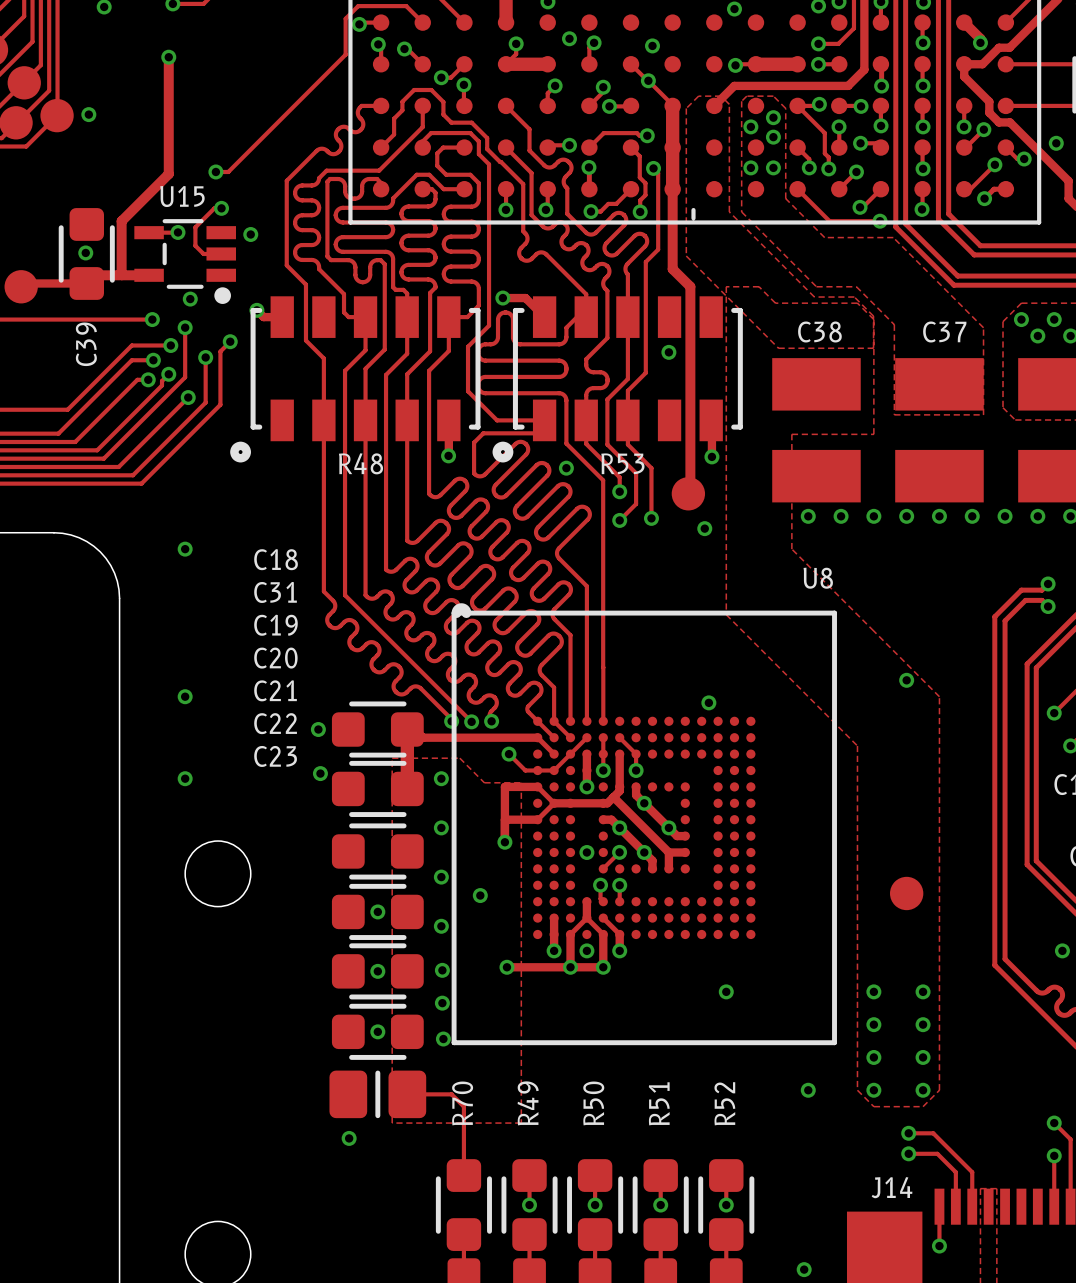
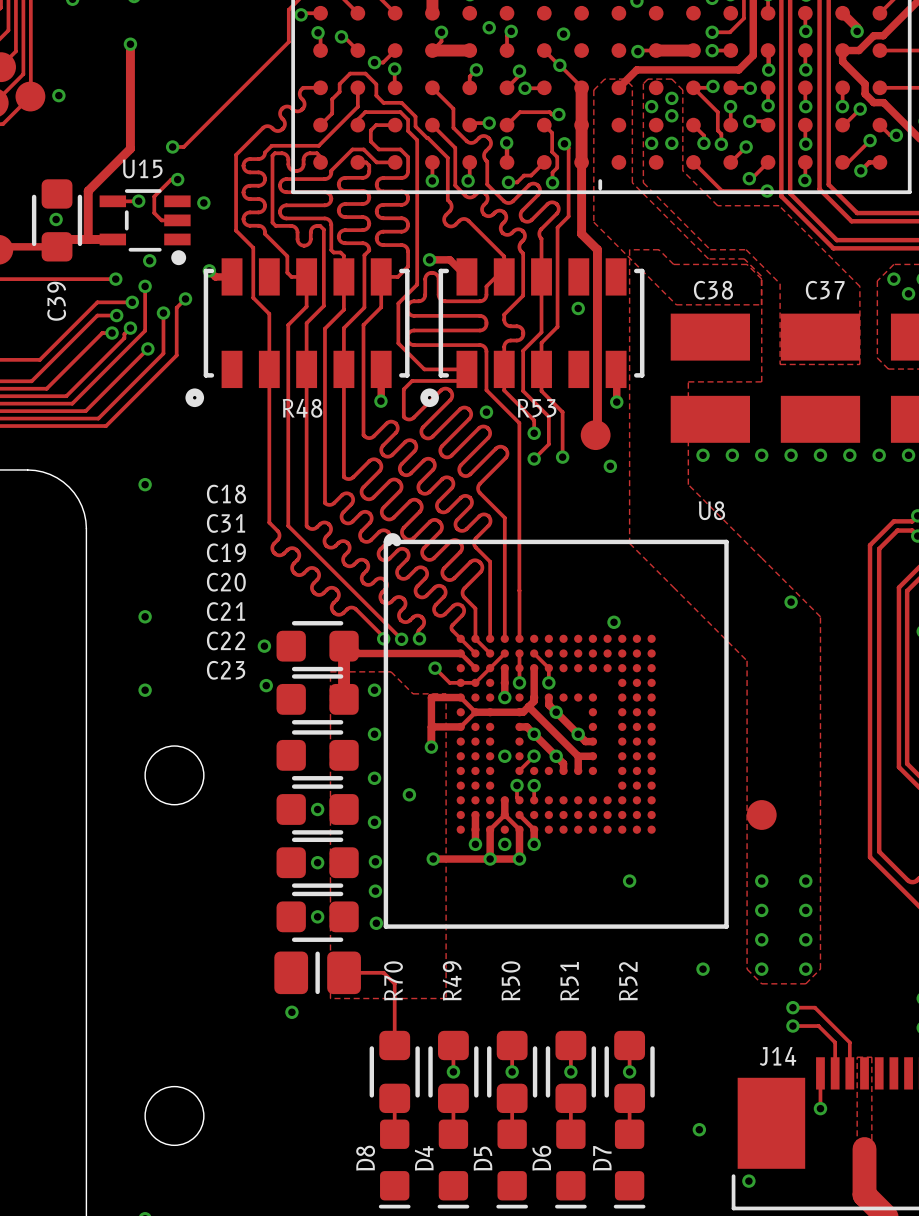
part position: (906, 893) -> (761, 814)

